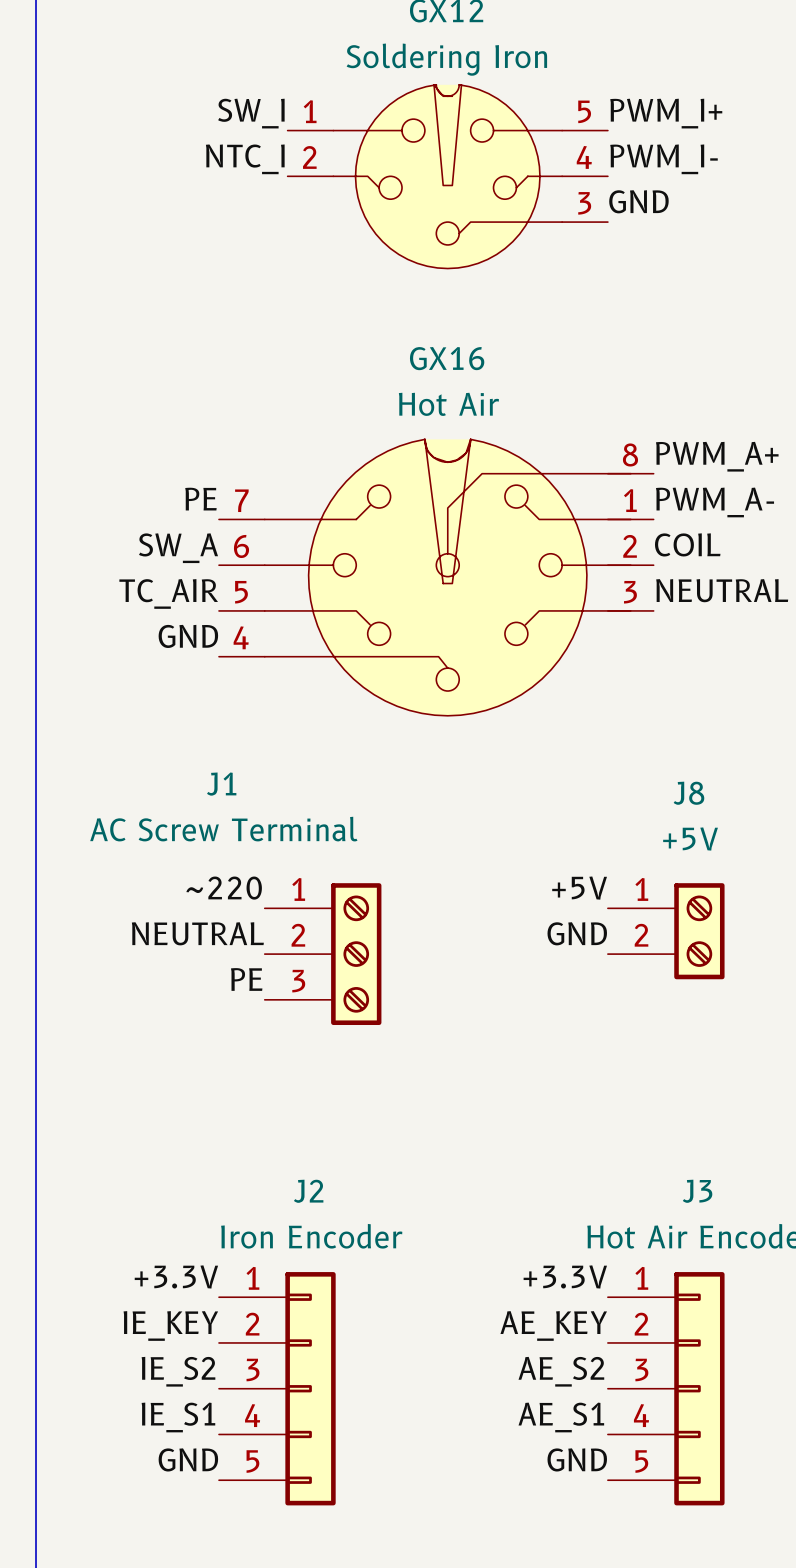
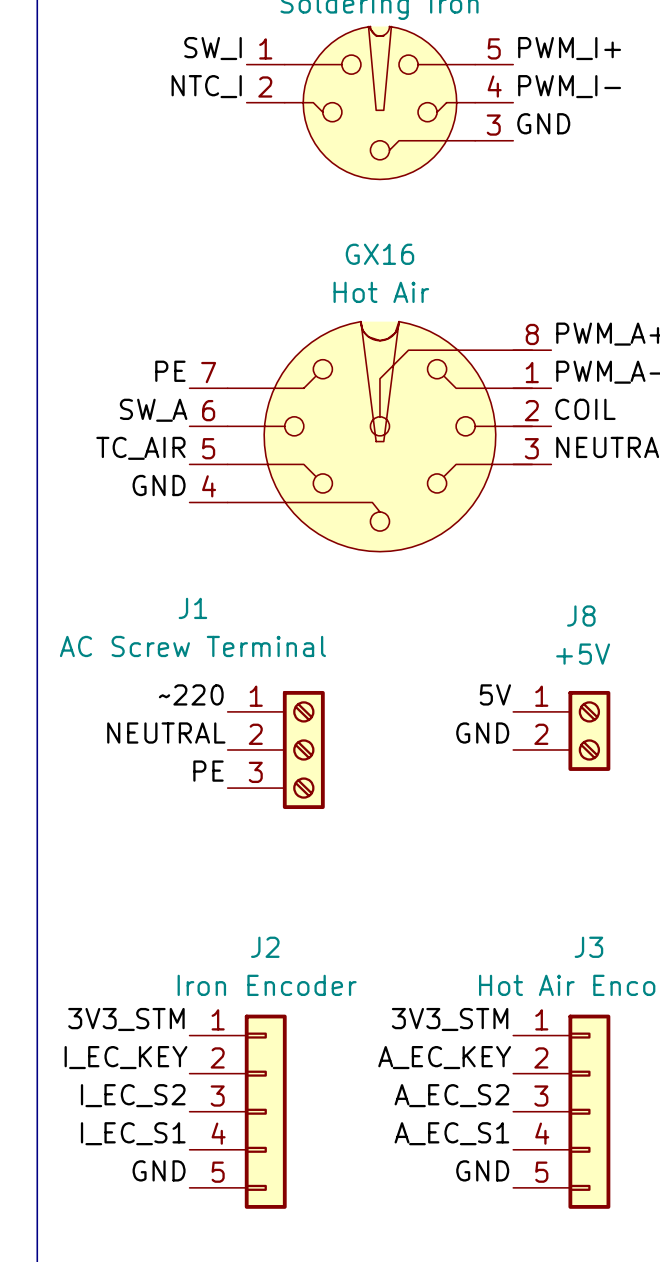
label: +5V (579, 888) -> 5V (495, 694)
label: +3.3V (176, 1276) -> 3V3_STM (126, 1019)
label: +3.3V (565, 1276) -> 3V3_STM (450, 1019)
label: IE_KEY (170, 1325) -> I_EC_KEY (125, 1057)
label: AE_KEY (553, 1325) -> A_EC_KEY (444, 1057)
label: IE_S2 (178, 1371) -> I_EC_S2 (133, 1095)
label: AE_S2 (561, 1371) -> A_EC_S2 (451, 1095)
label: IE_S1 (178, 1417) -> I_EC_S1 (133, 1133)
label: AE_S1 (561, 1417) -> A_EC_S1 (451, 1133)

